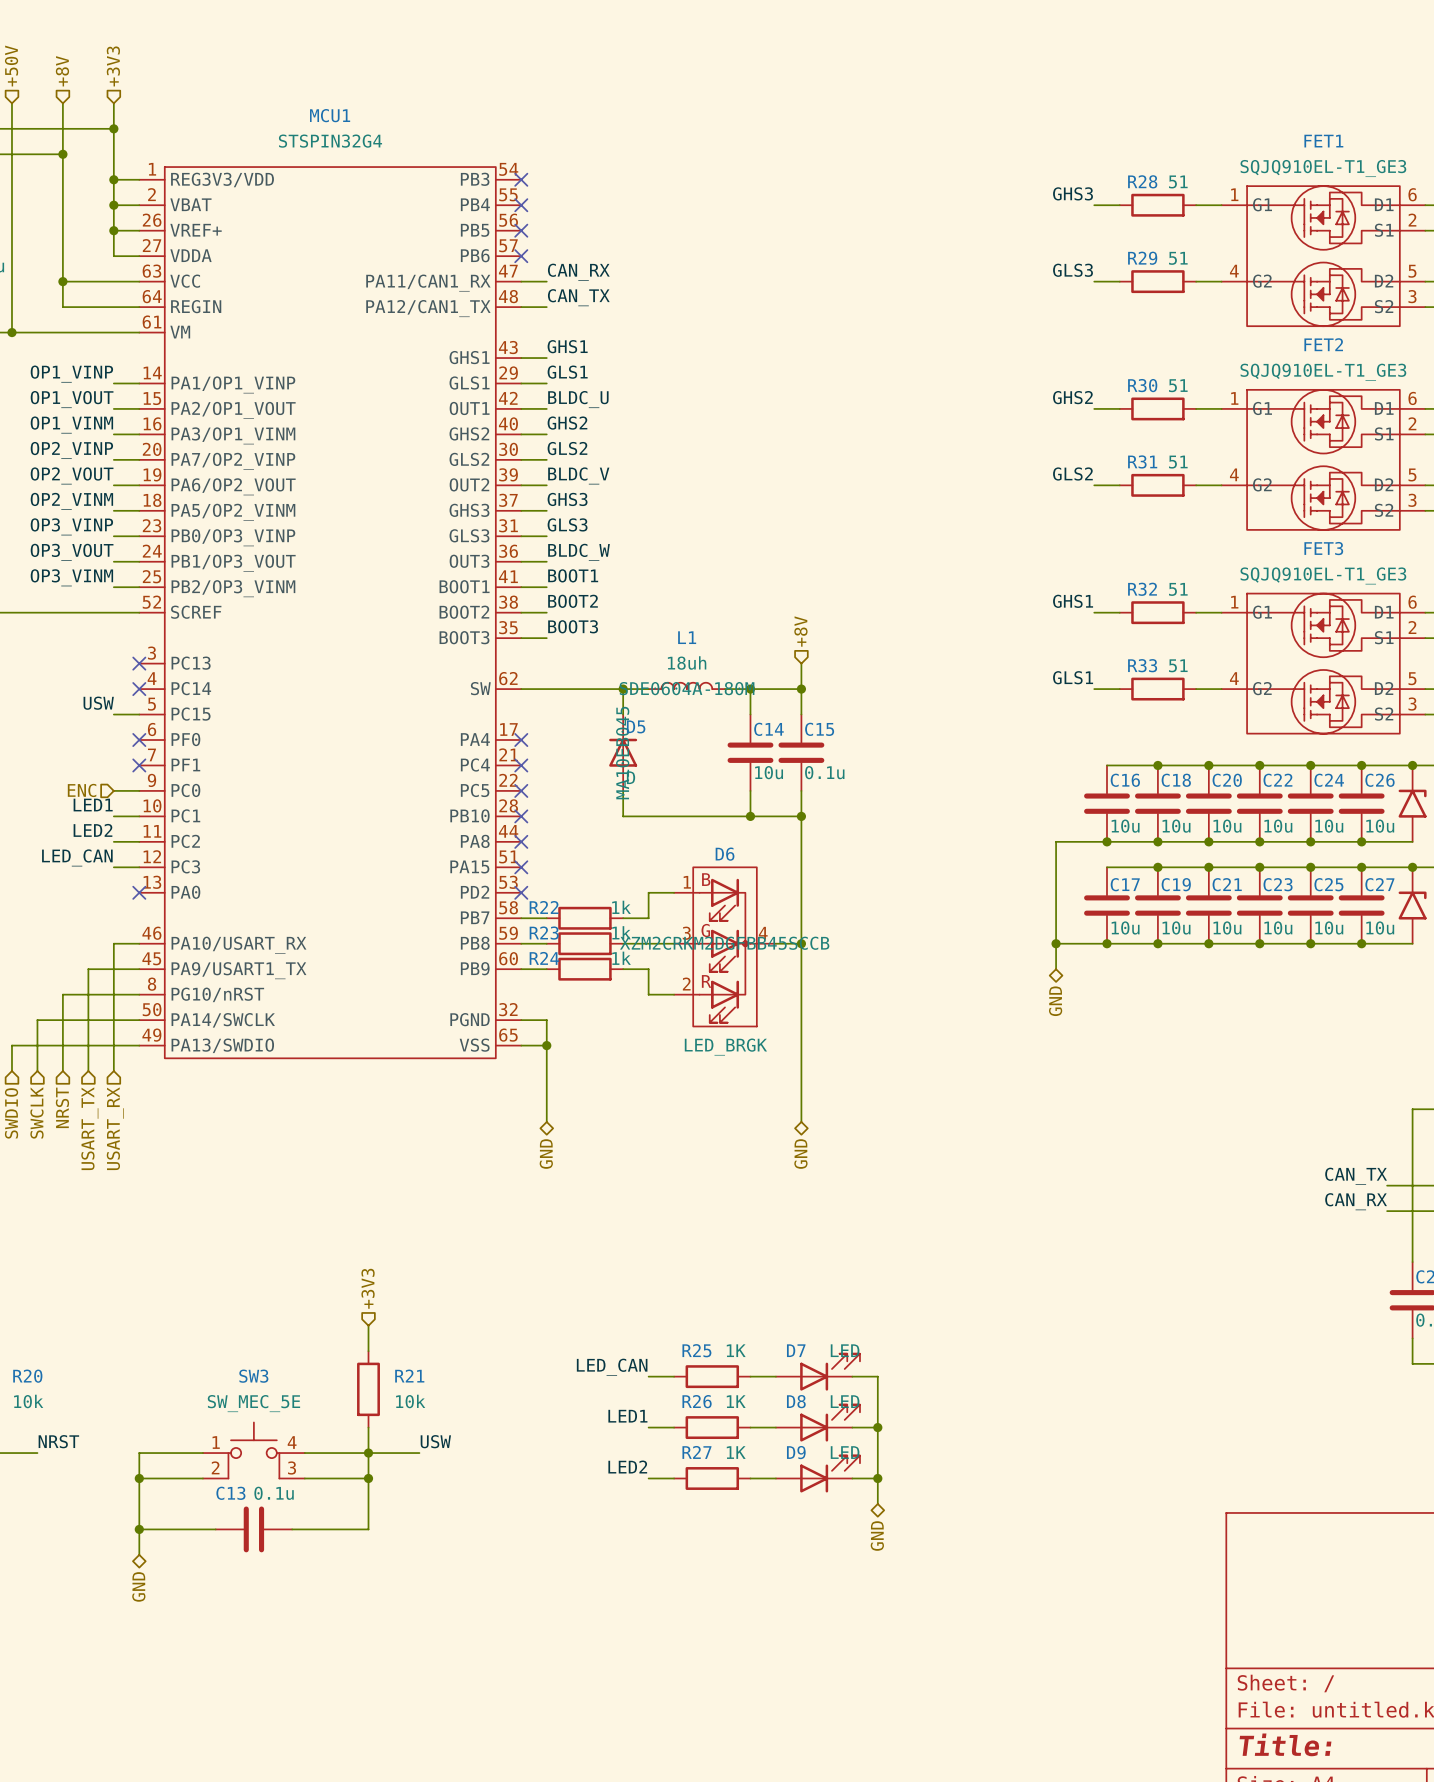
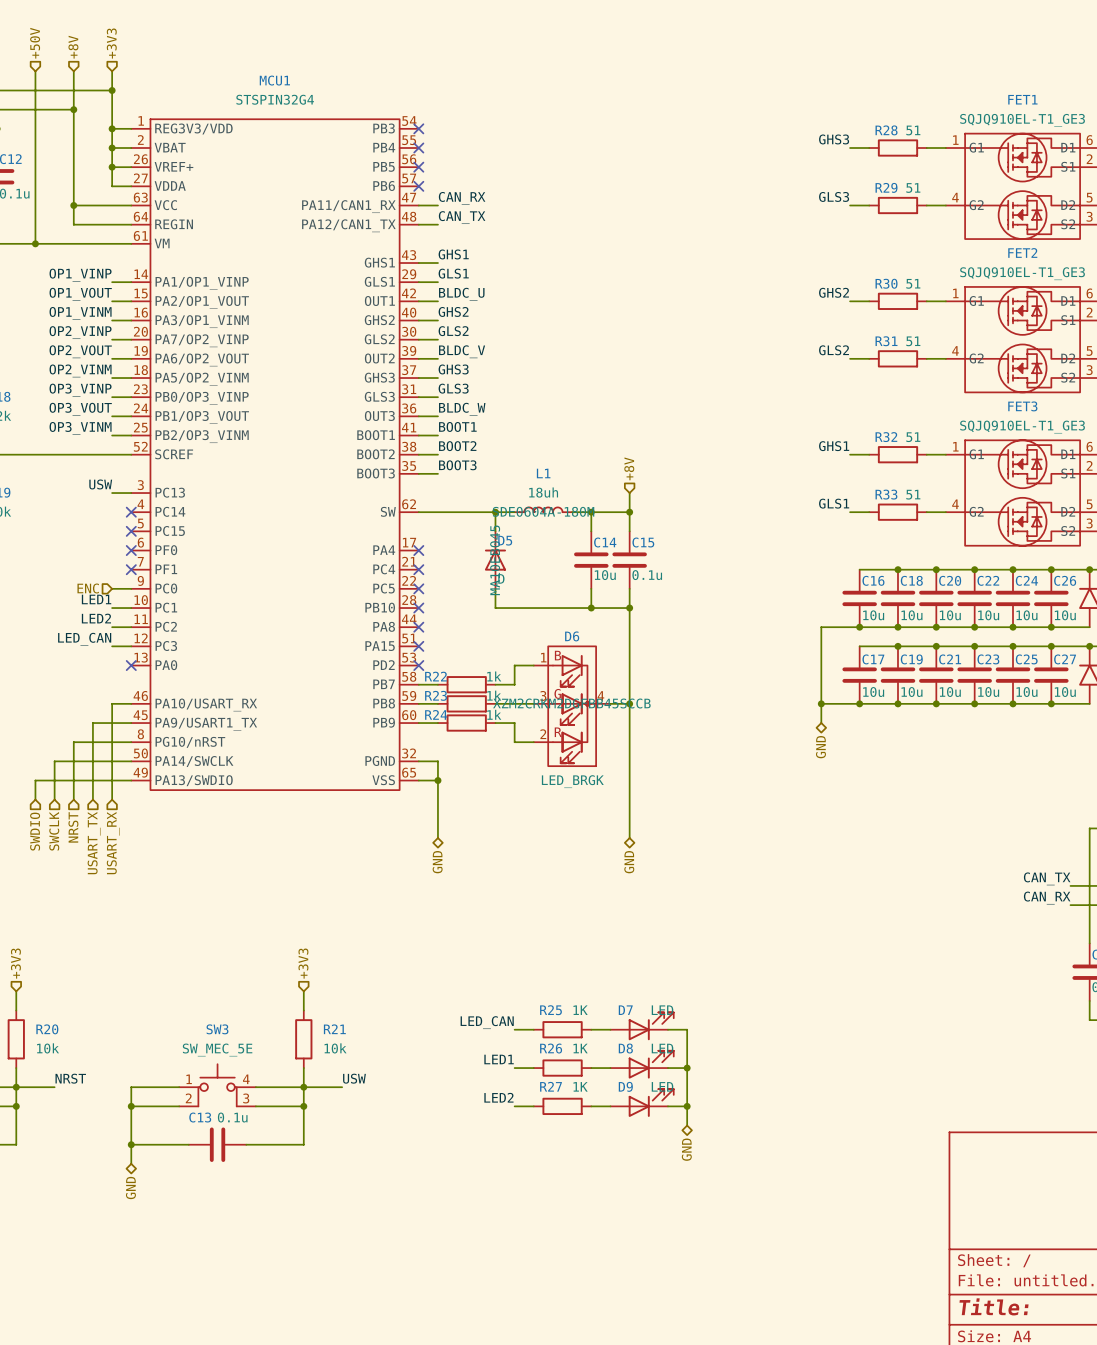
no-connect mark position: (139, 663) -> (131, 531)
label position: USW (98, 703) -> USW (100, 484)
wire: (113, 714) (139, 714) -> (112, 493) (131, 493)

